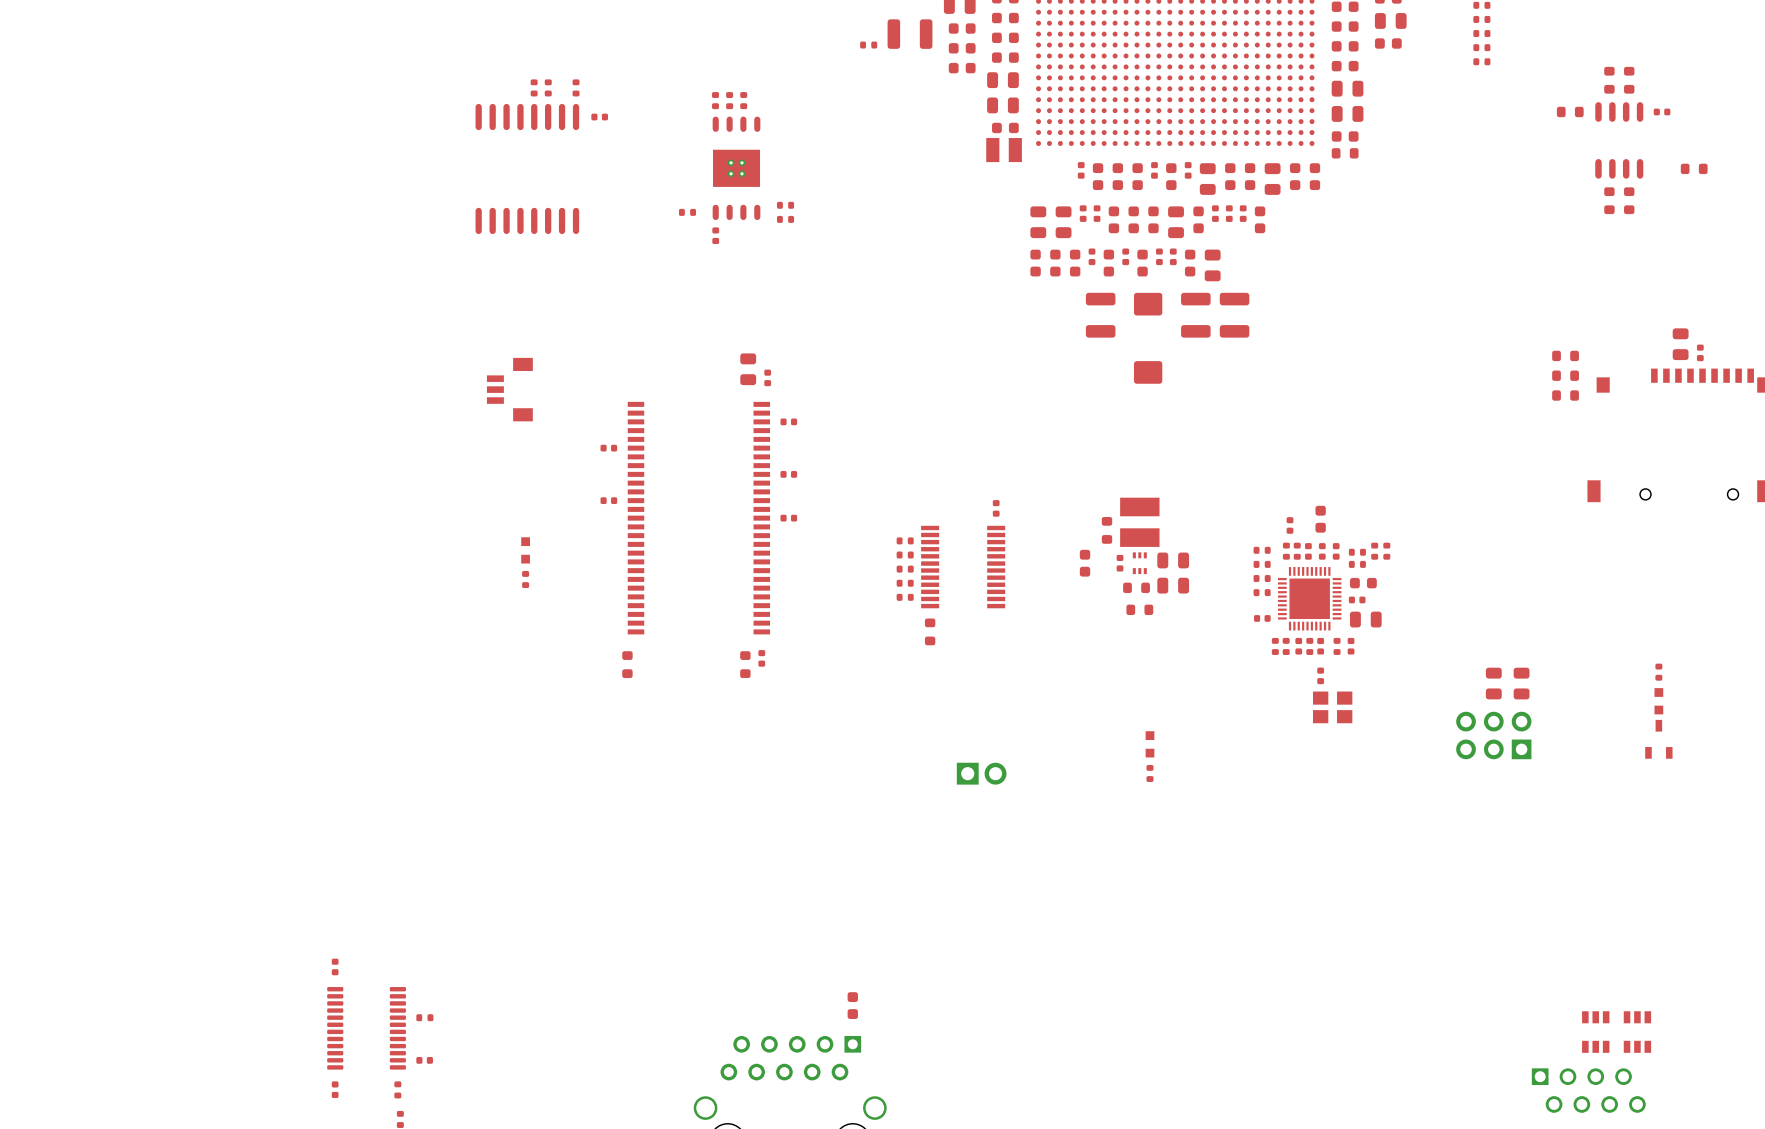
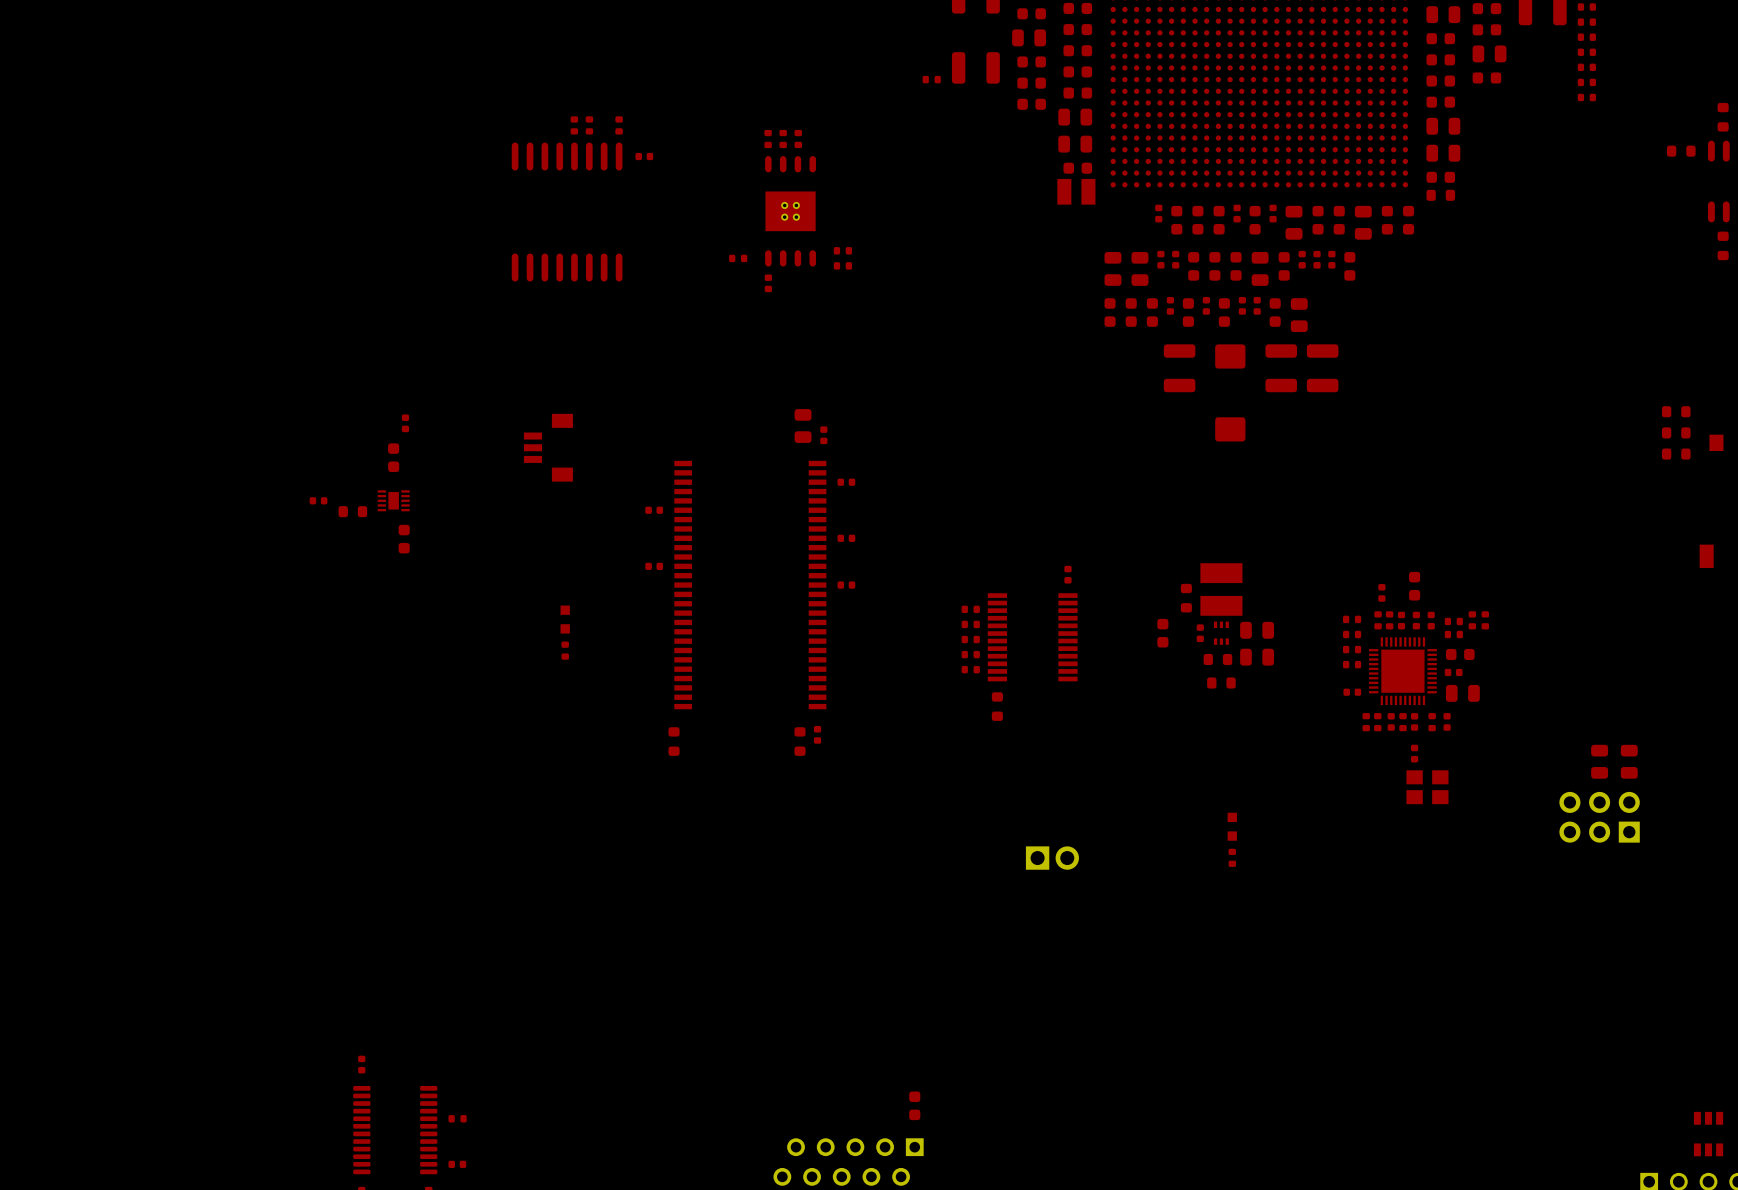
part: none -> (405, 423)
part: none -> (393, 457)
part: none -> (318, 500)
part: none -> (393, 500)
part: none -> (352, 511)
part: none -> (404, 539)

